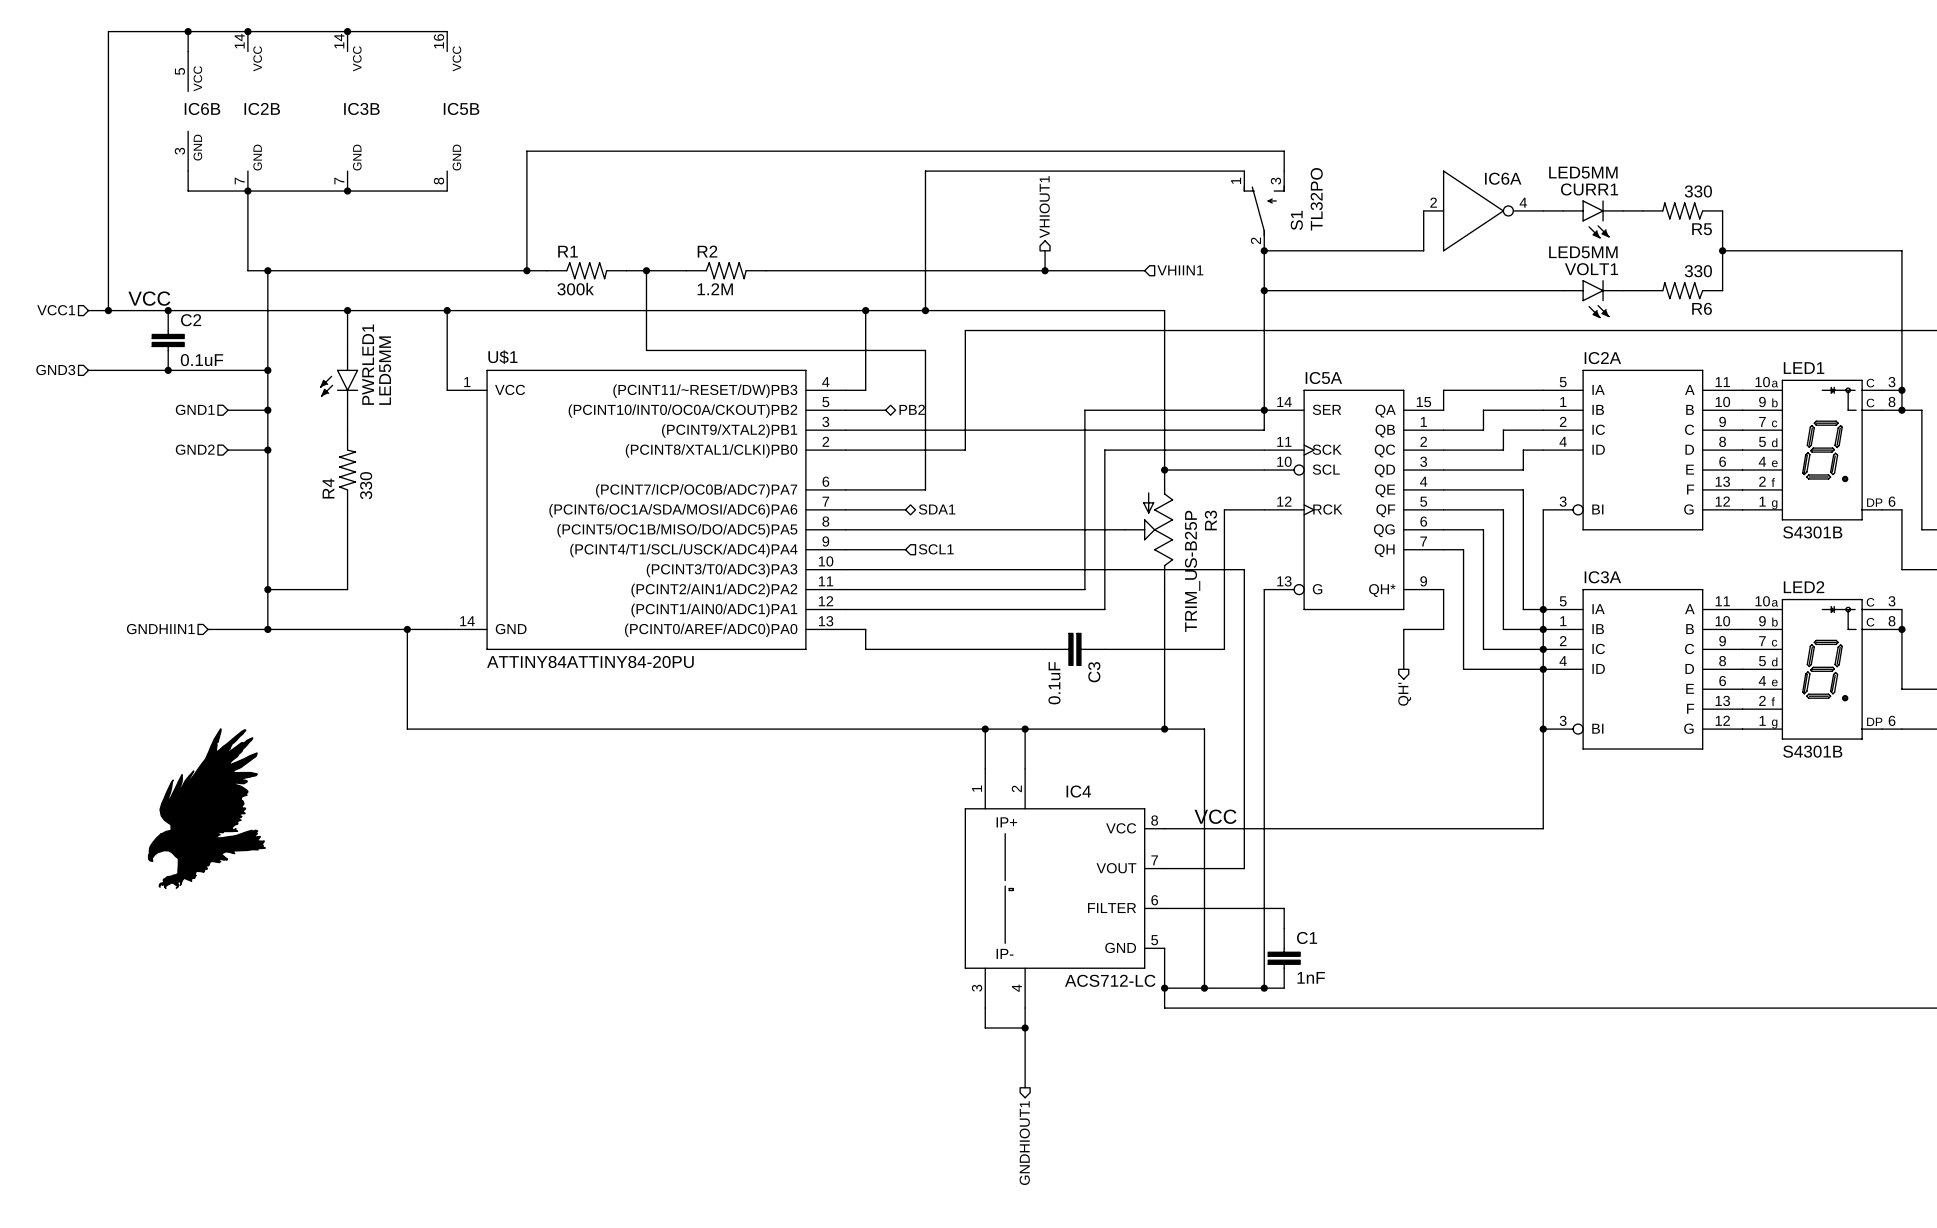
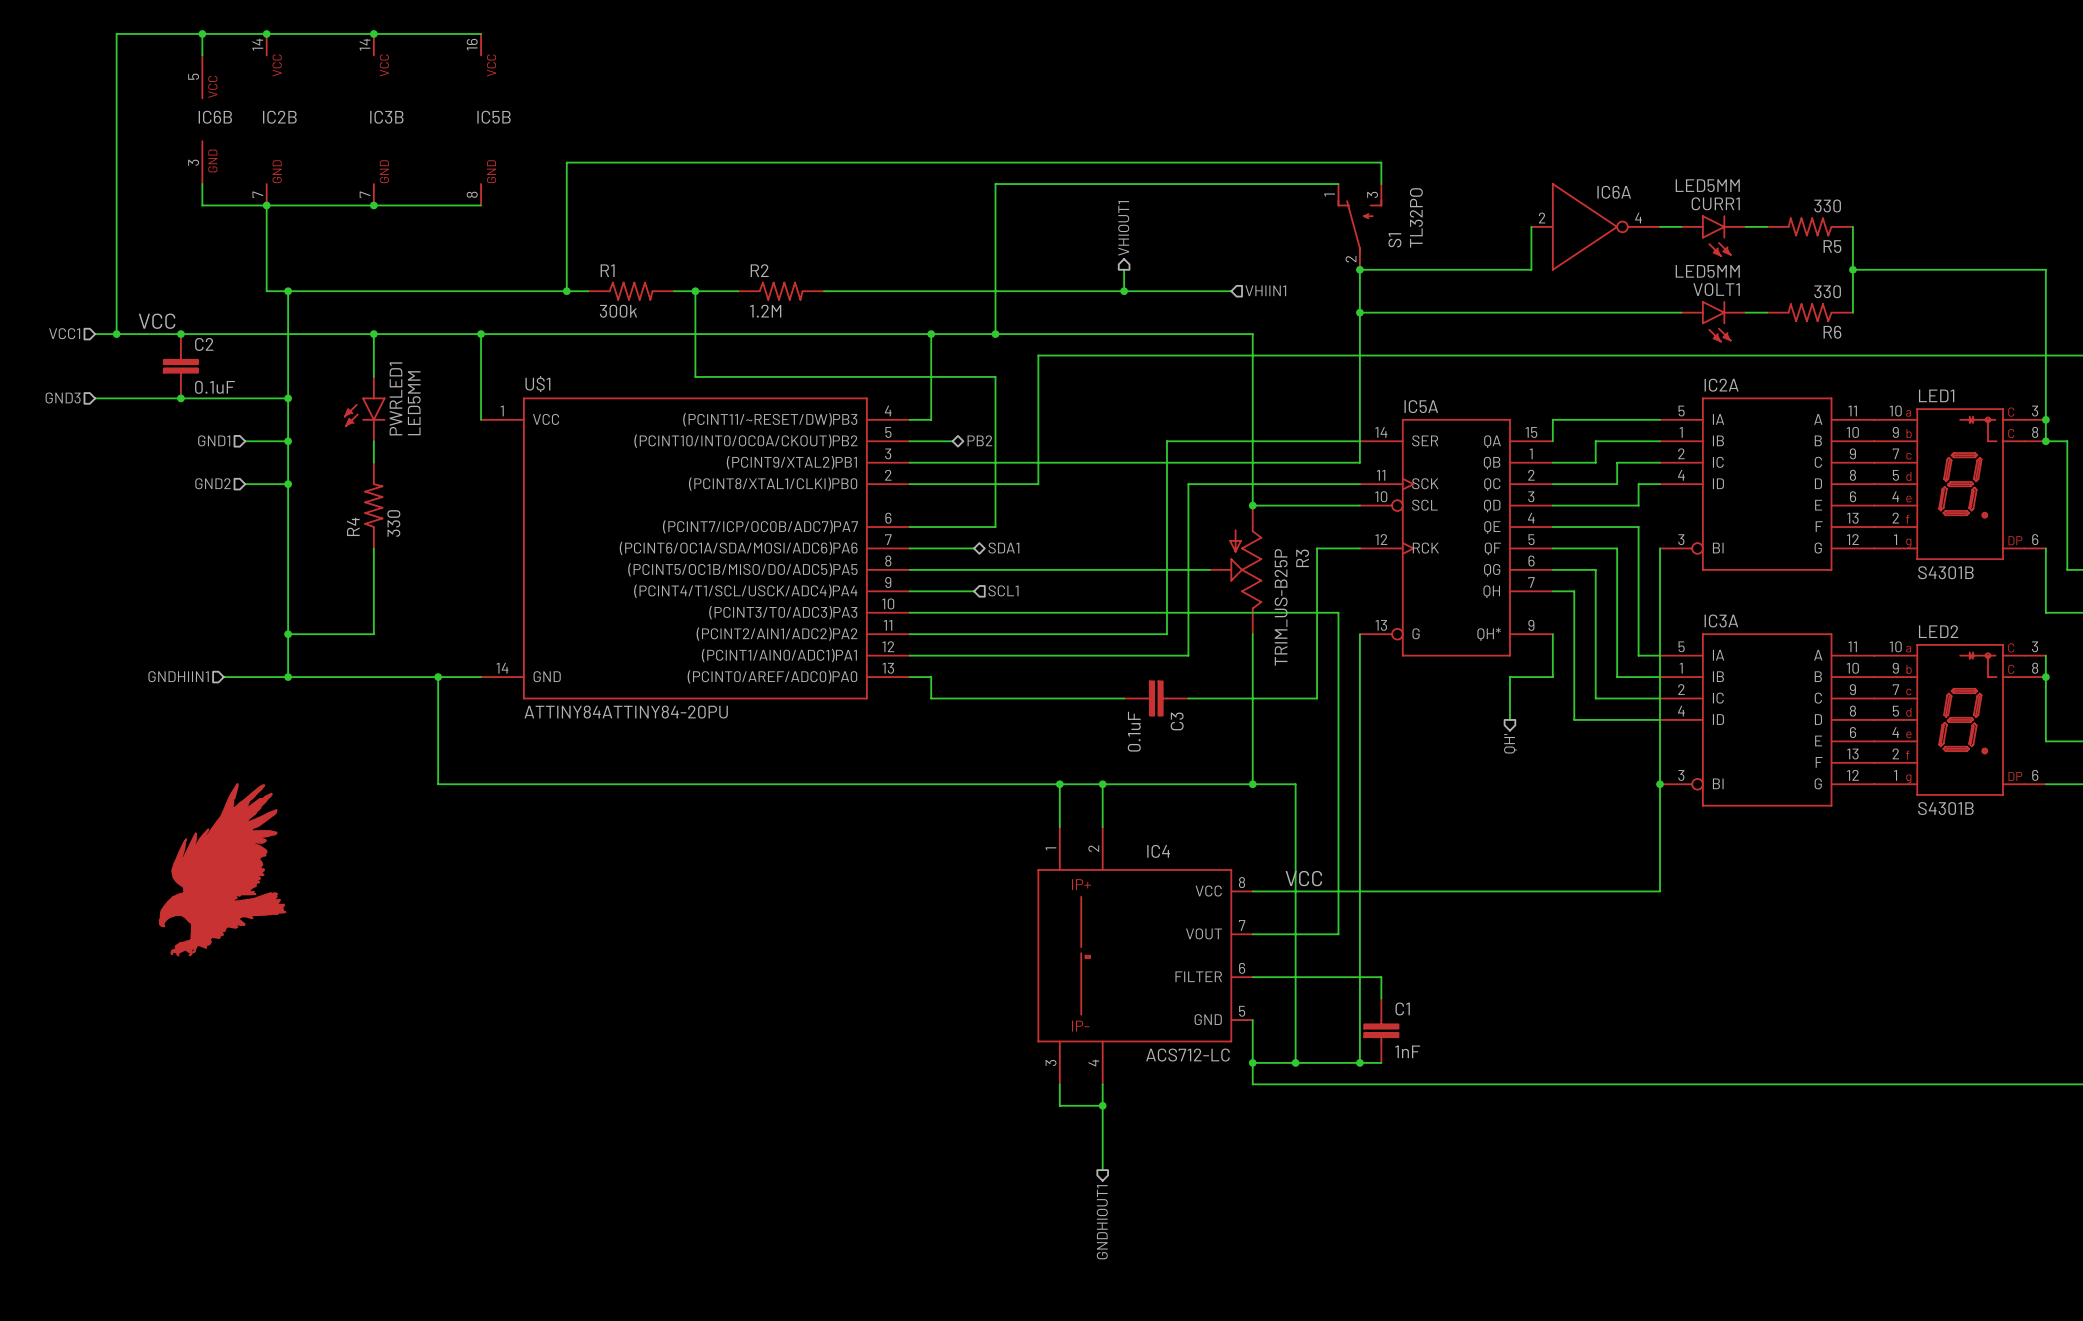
junction: (1264, 410) -> none
junction: (1543, 609) -> none
junction: (1543, 629) -> none
junction: (1543, 649) -> none
junction: (1543, 669) -> none

